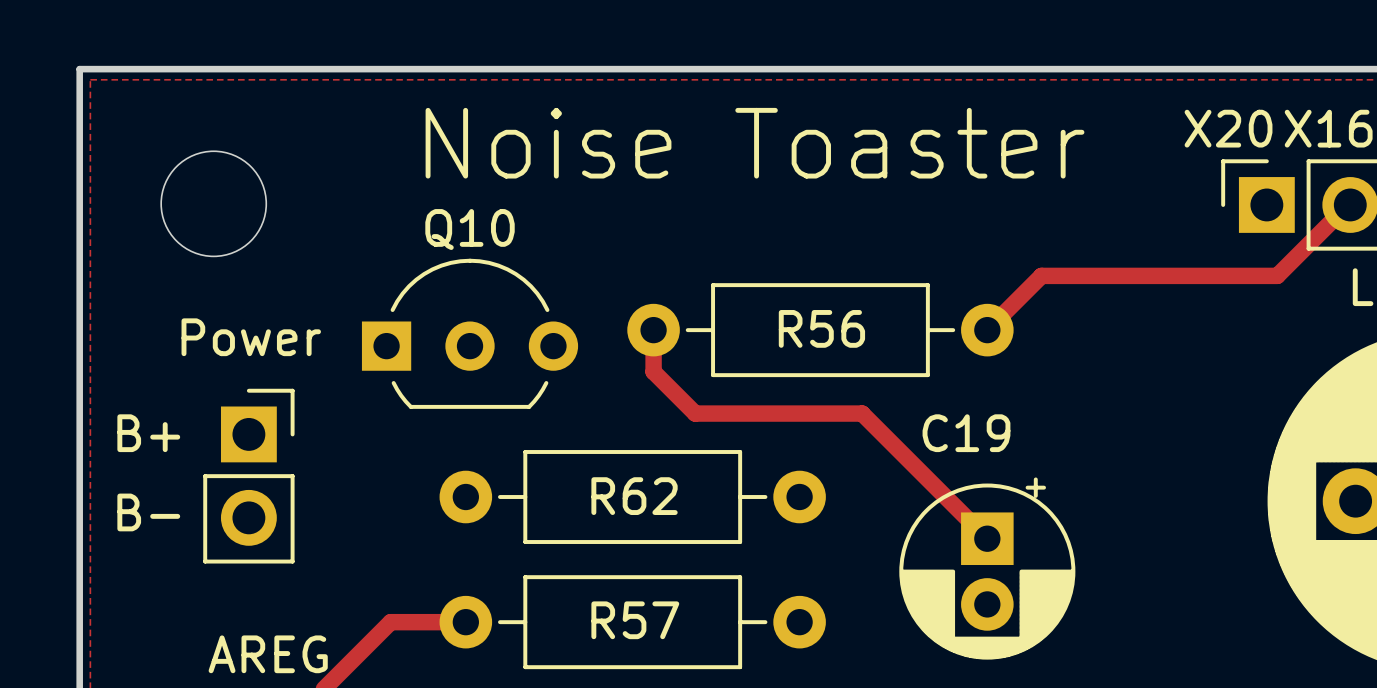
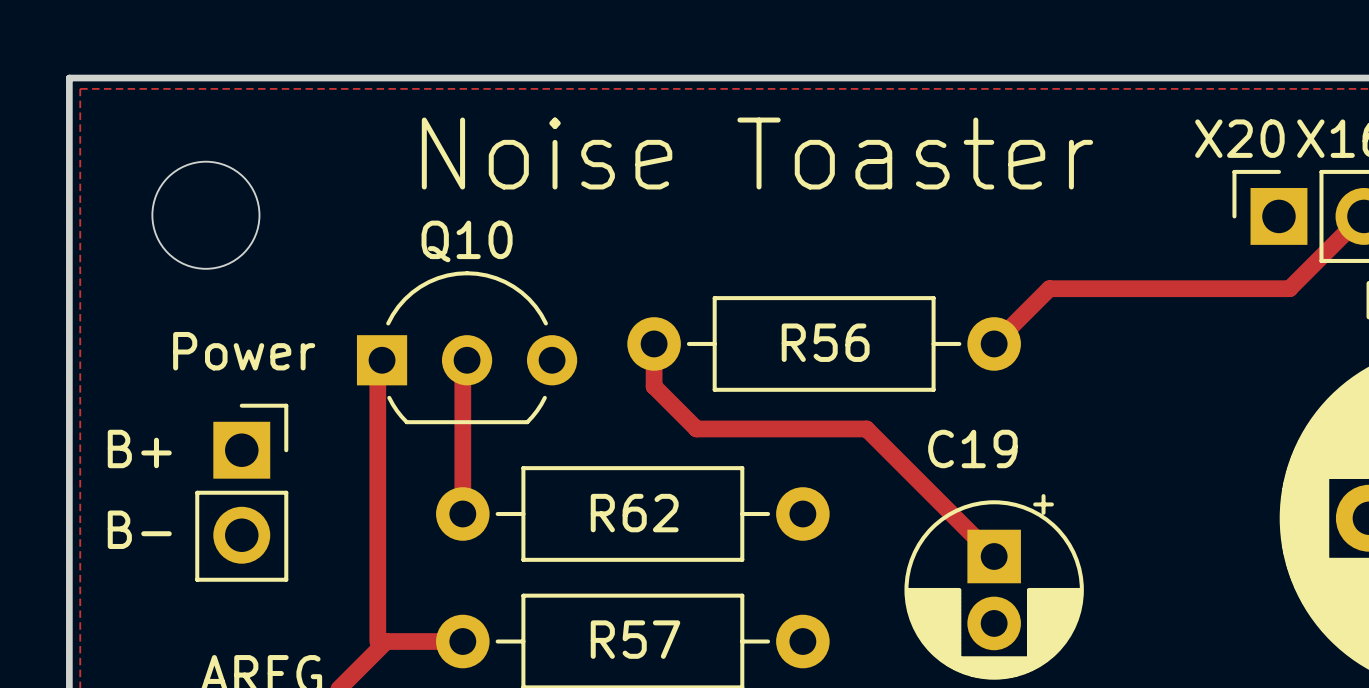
track: none -> (377, 359) (377, 641)
track: none -> (462, 359) (462, 513)

